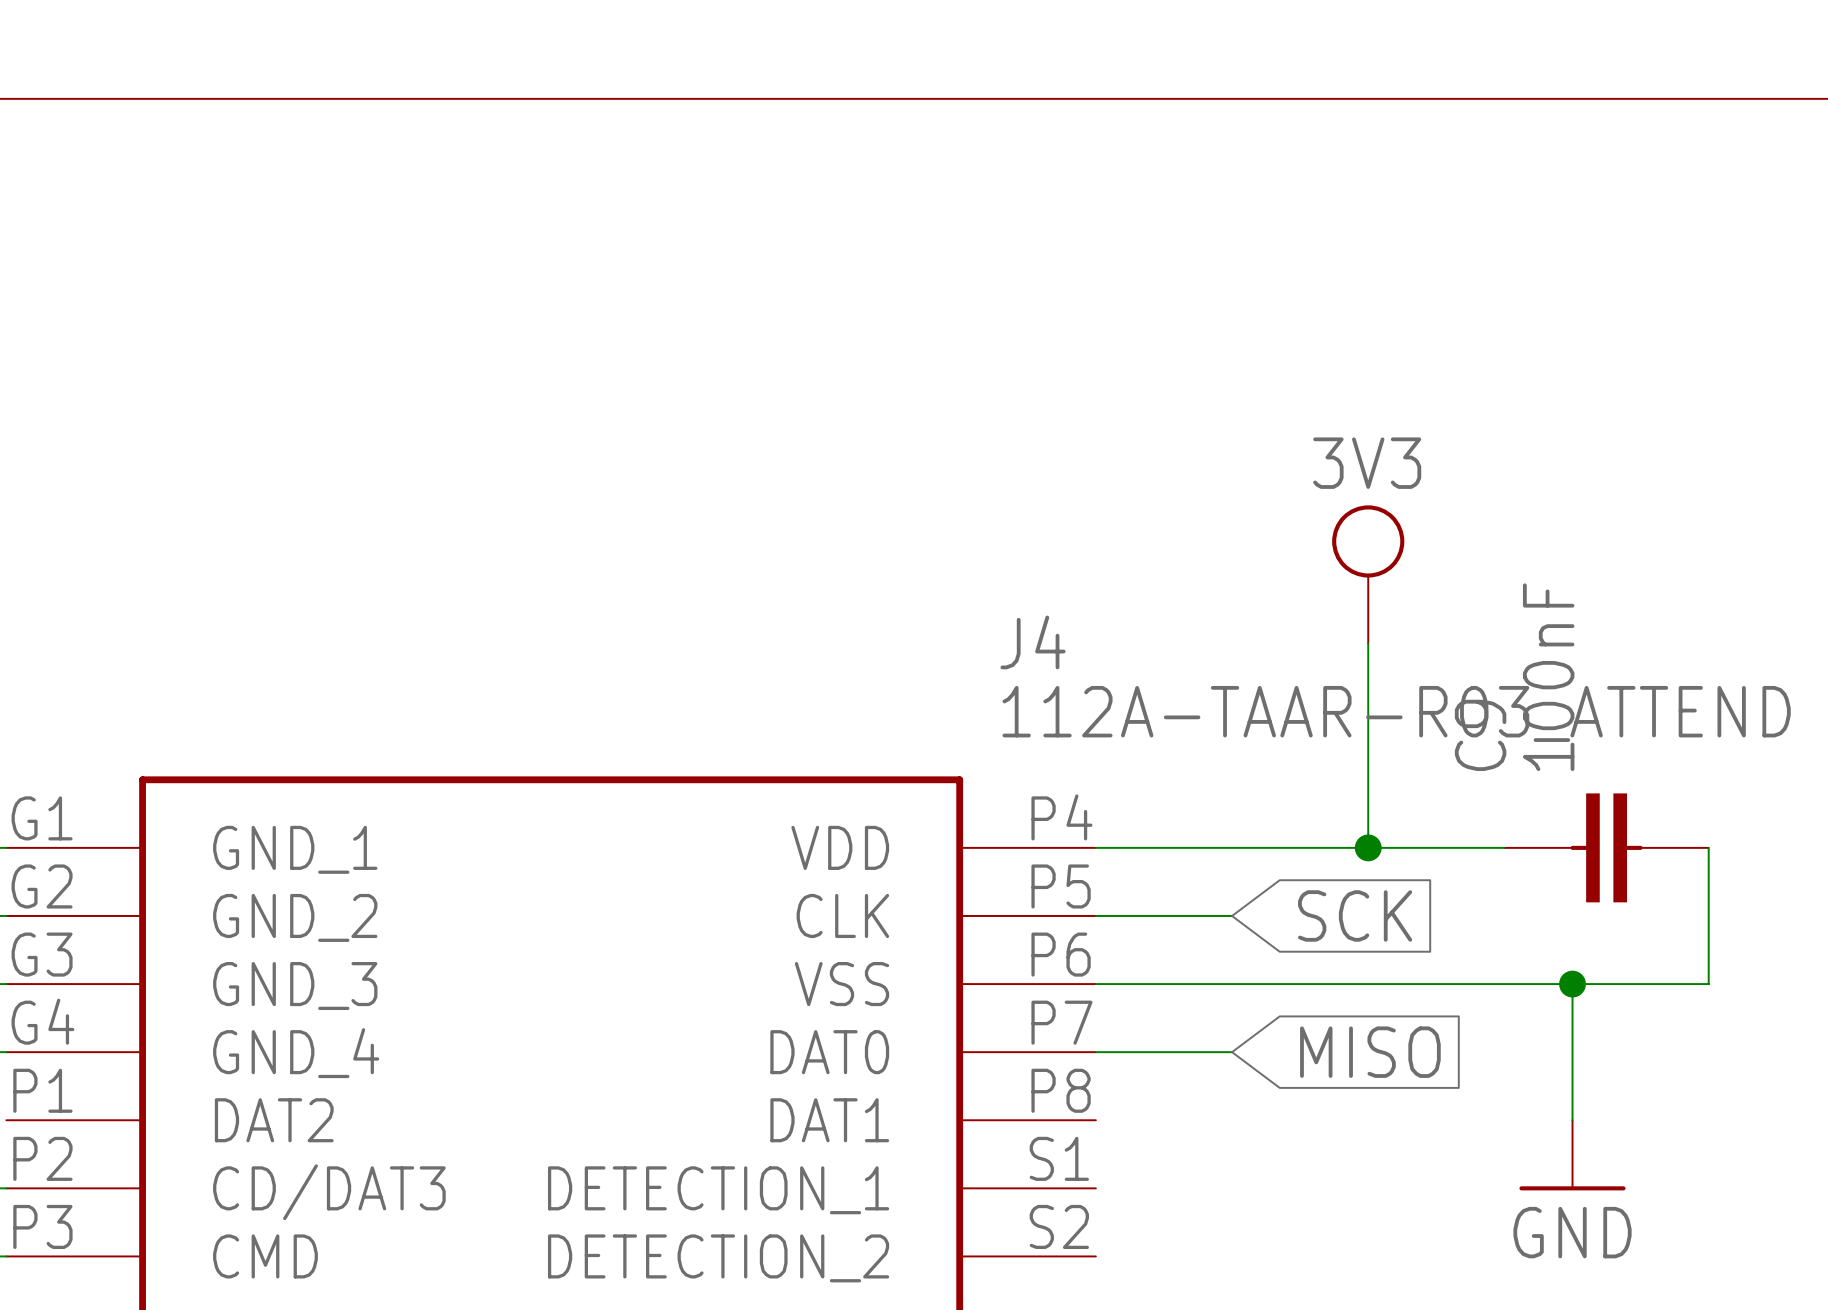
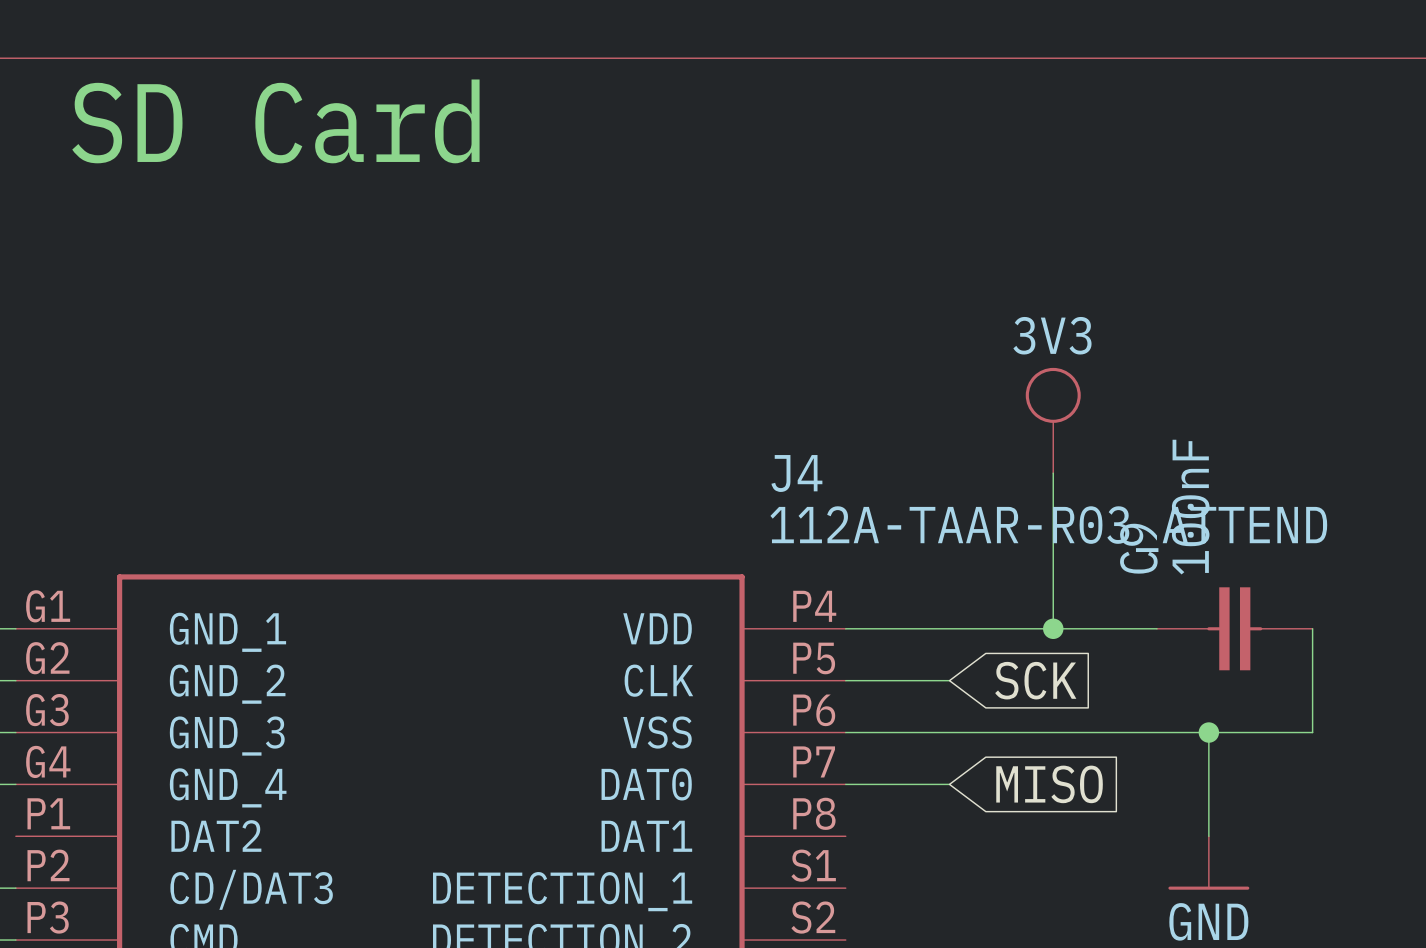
text: none -> SD Card (275, 121)

